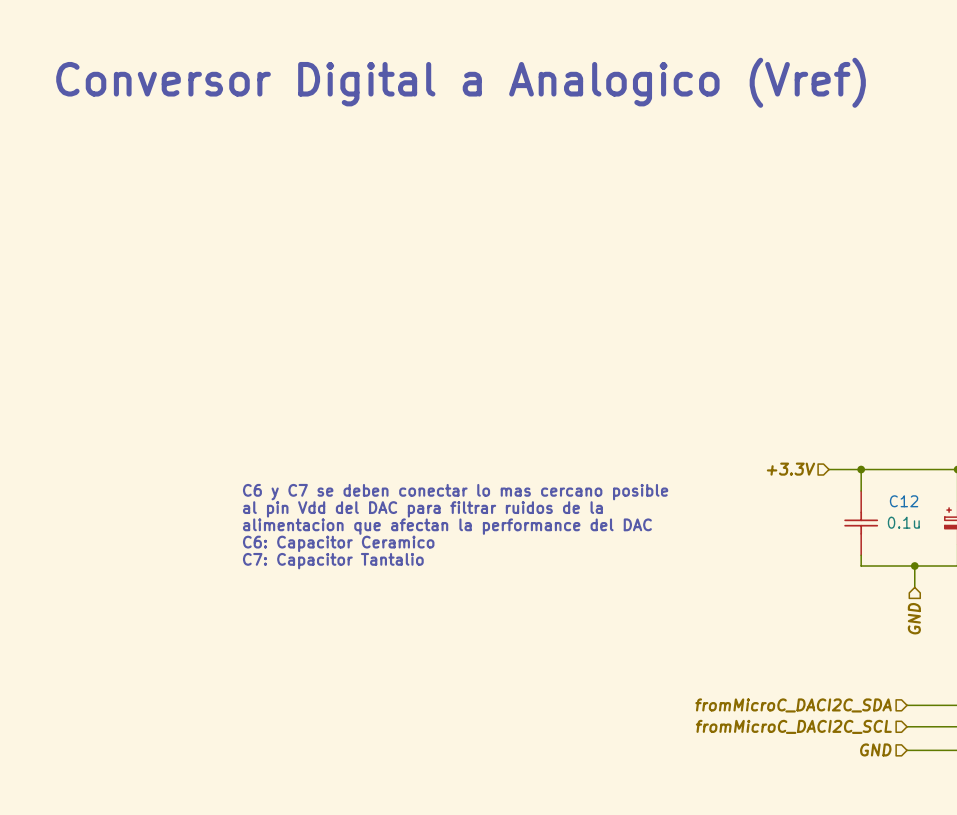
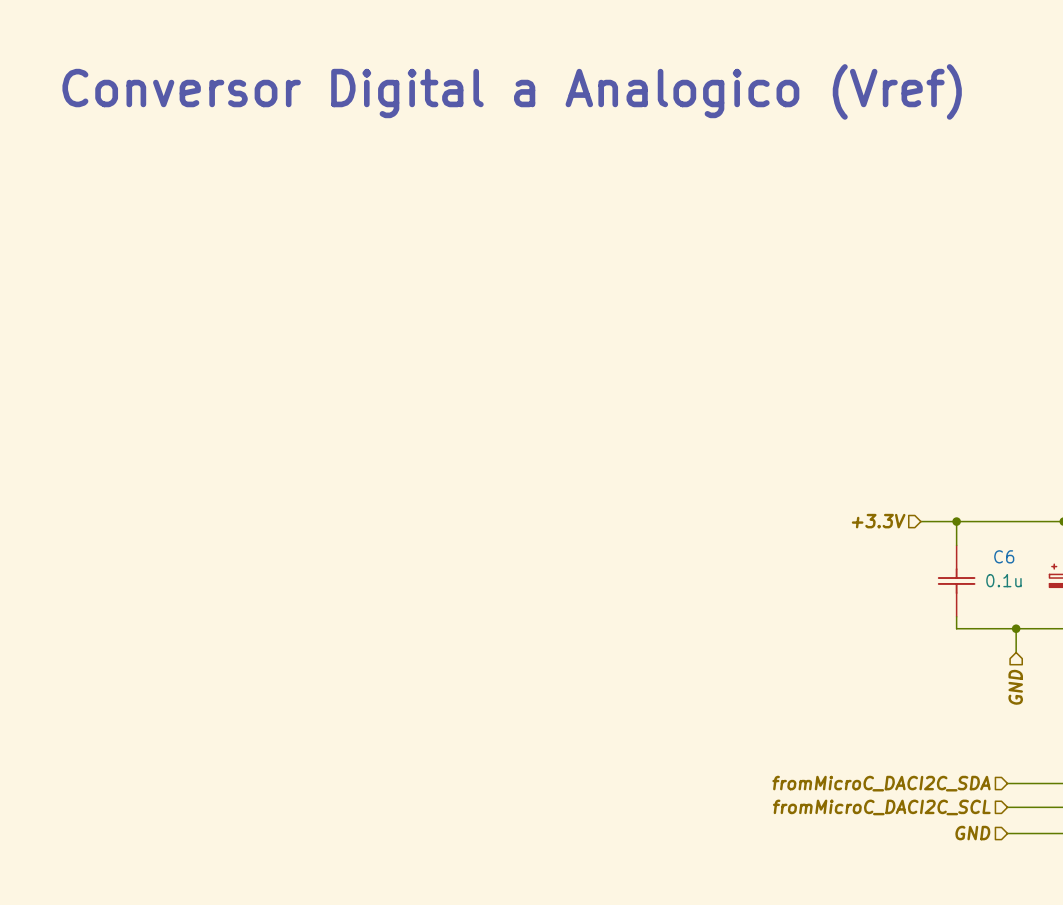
text: C6 y C7 se deben conectar lo mas cercano posible (455, 492) -> none
C12 name: C12 (904, 501) -> C6 (1004, 556)
text: al pin Vdd del DAC para filtrar ruidos de la (422, 509) -> none
text: alimentacion que afectan la performance del DAC (447, 526) -> none
text: C6: Capacitor Ceramico (338, 543) -> none
text: C7: Capacitor Tantalio (333, 561) -> none

